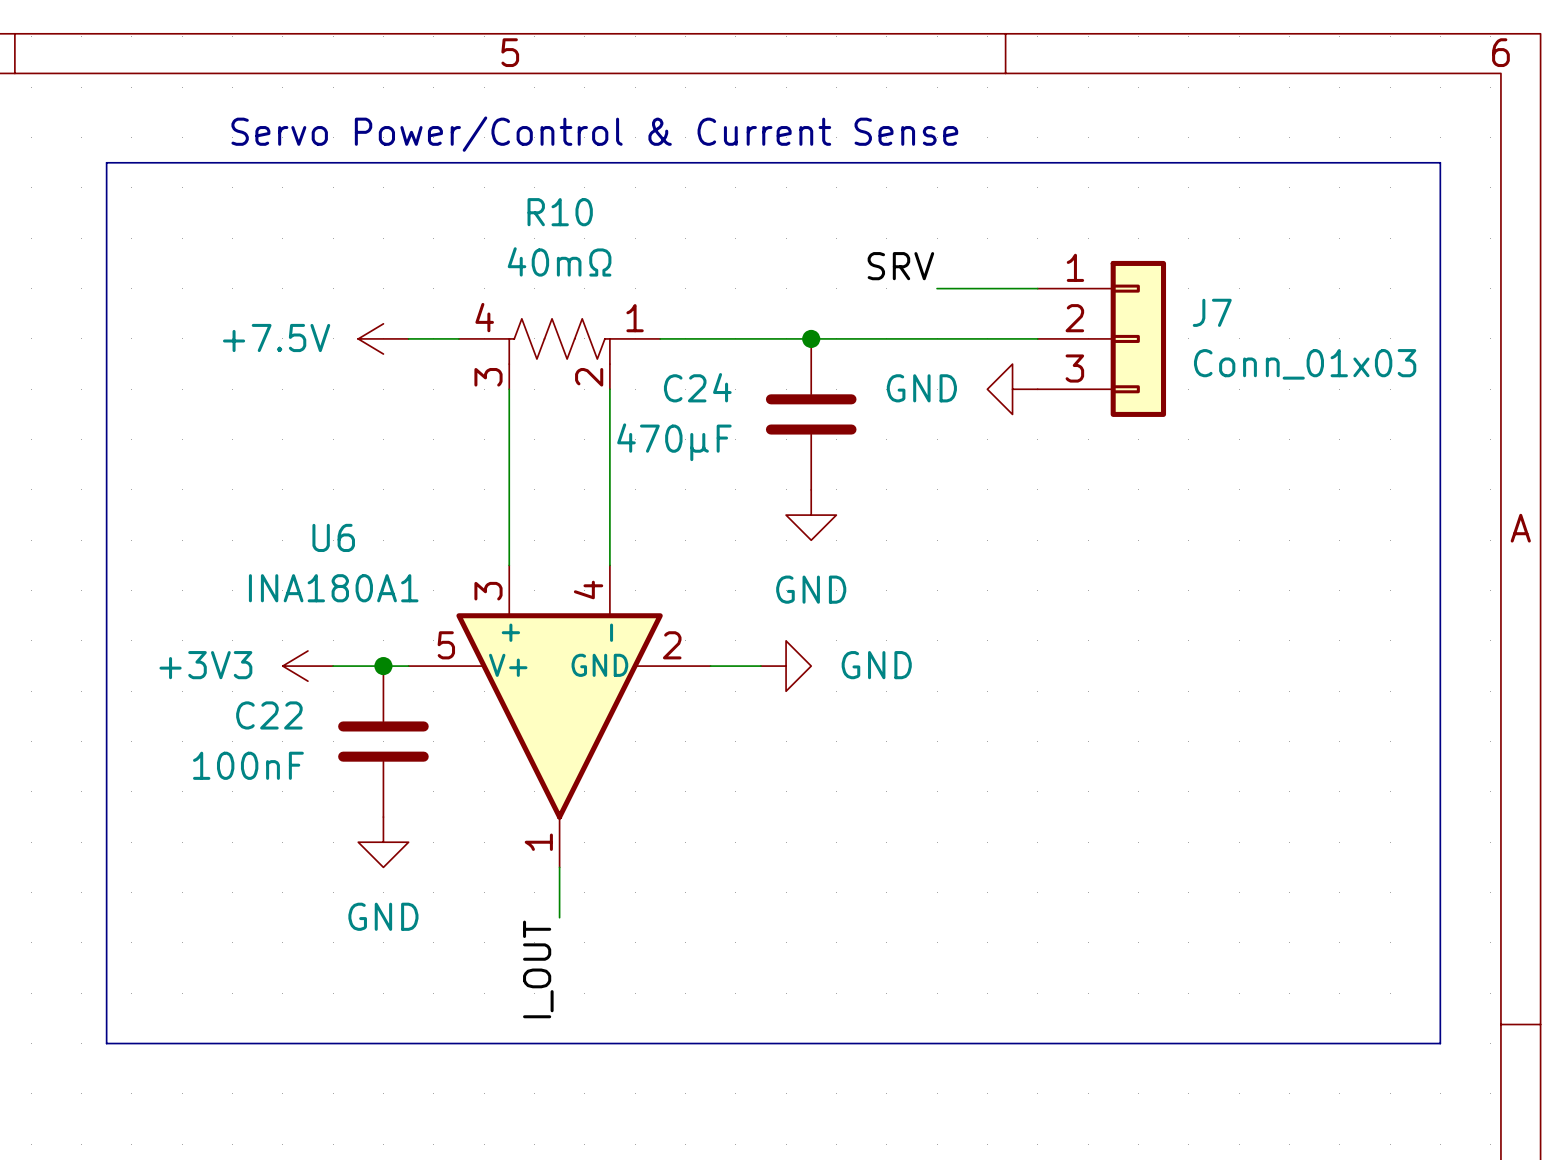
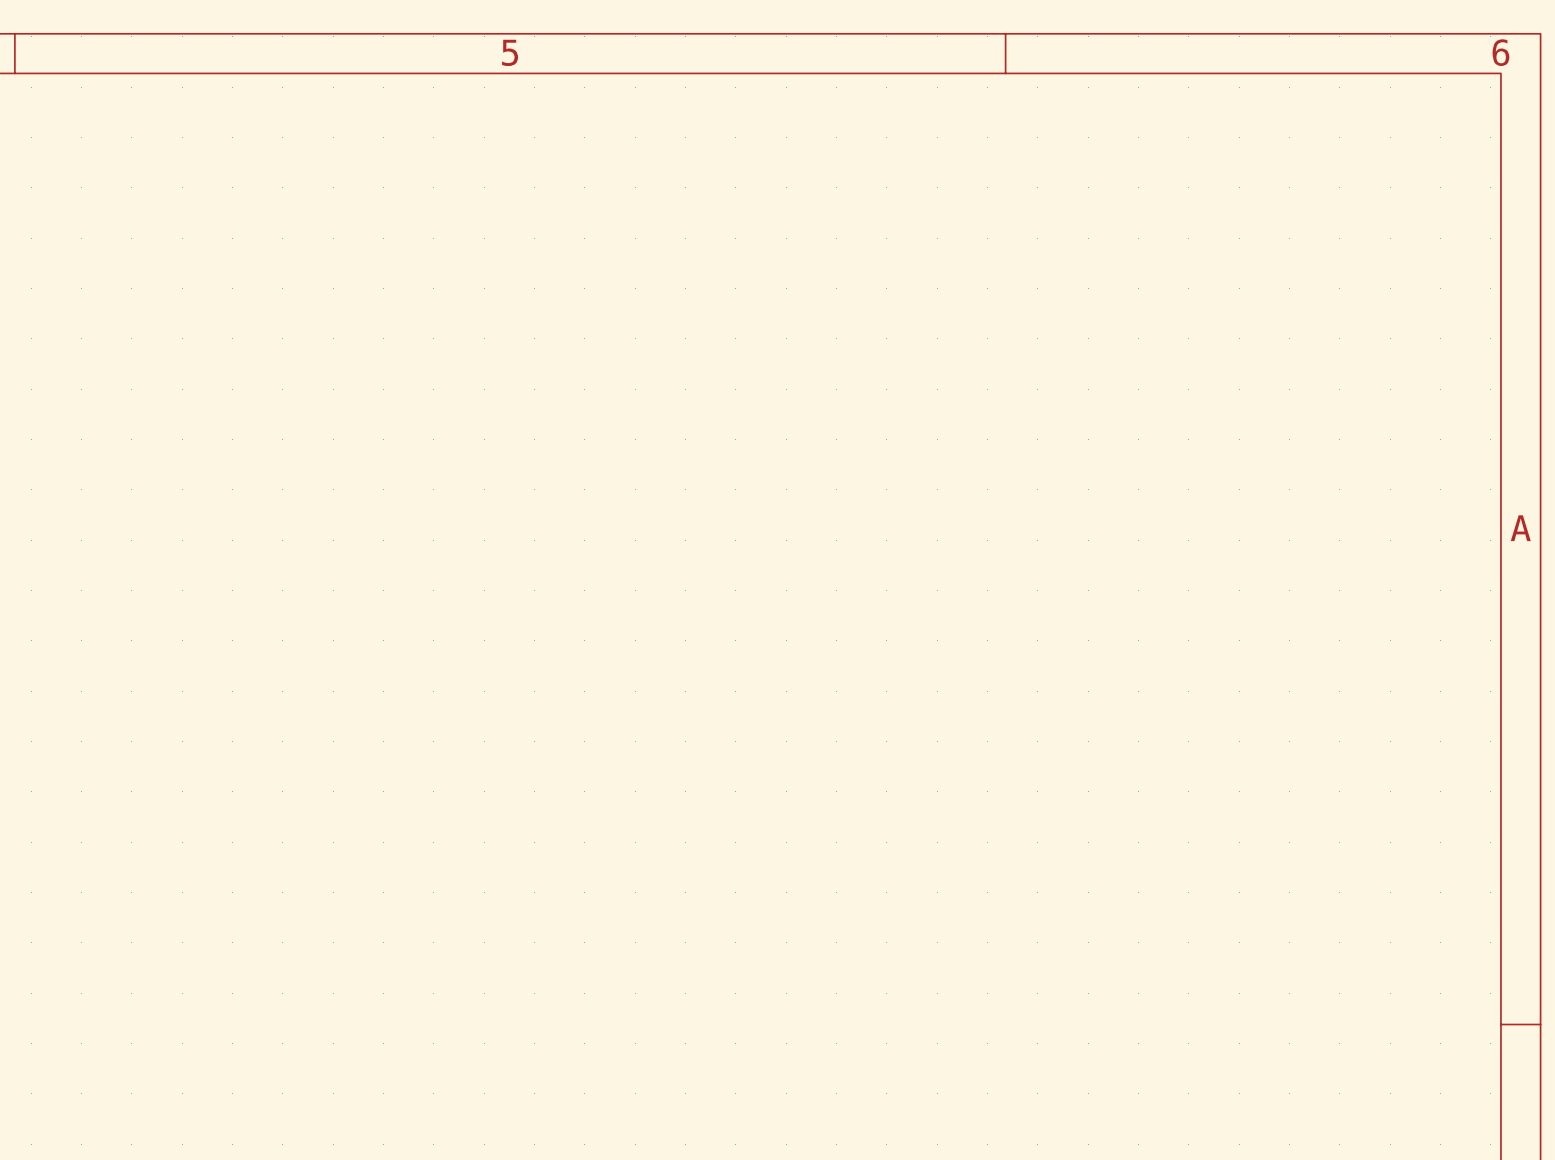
text: Servo Power/Control & Current Sense (594, 134) -> none
line: (106, 162) (1440, 162) (1440, 1043) (106, 1043) (106, 162) -> none
label: SRV (900, 266) -> none
wire: (937, 288) (1037, 288) -> none
power symbol: +7.5V (383, 338) -> none
wire: (408, 338) (458, 338) -> none
wire: (660, 338) (1037, 338) -> none
junction: (811, 338) -> none
J7: Conn_01x03 (1101, 338) -> none
R10: 40mΩ (559, 354) -> none
wire: (509, 389) (509, 565) -> none
wire: (609, 389) (609, 565) -> none
power symbol: GND (1012, 389) -> none
C24: 470μF (811, 414) -> none
power symbol: GND (811, 515) -> none
power symbol: +3V3 (307, 666) -> none
wire: (333, 666) (408, 666) -> none
junction: (383, 666) -> none
wire: (710, 666) (760, 666) -> none
power symbol: GND (786, 666) -> none
U6: INA180A1 (559, 716) -> none
C22: 100nF (383, 741) -> none
power symbol: GND (383, 842) -> none
wire: (559, 867) (559, 917) -> none
label: I_OUT (538, 969) -> none

